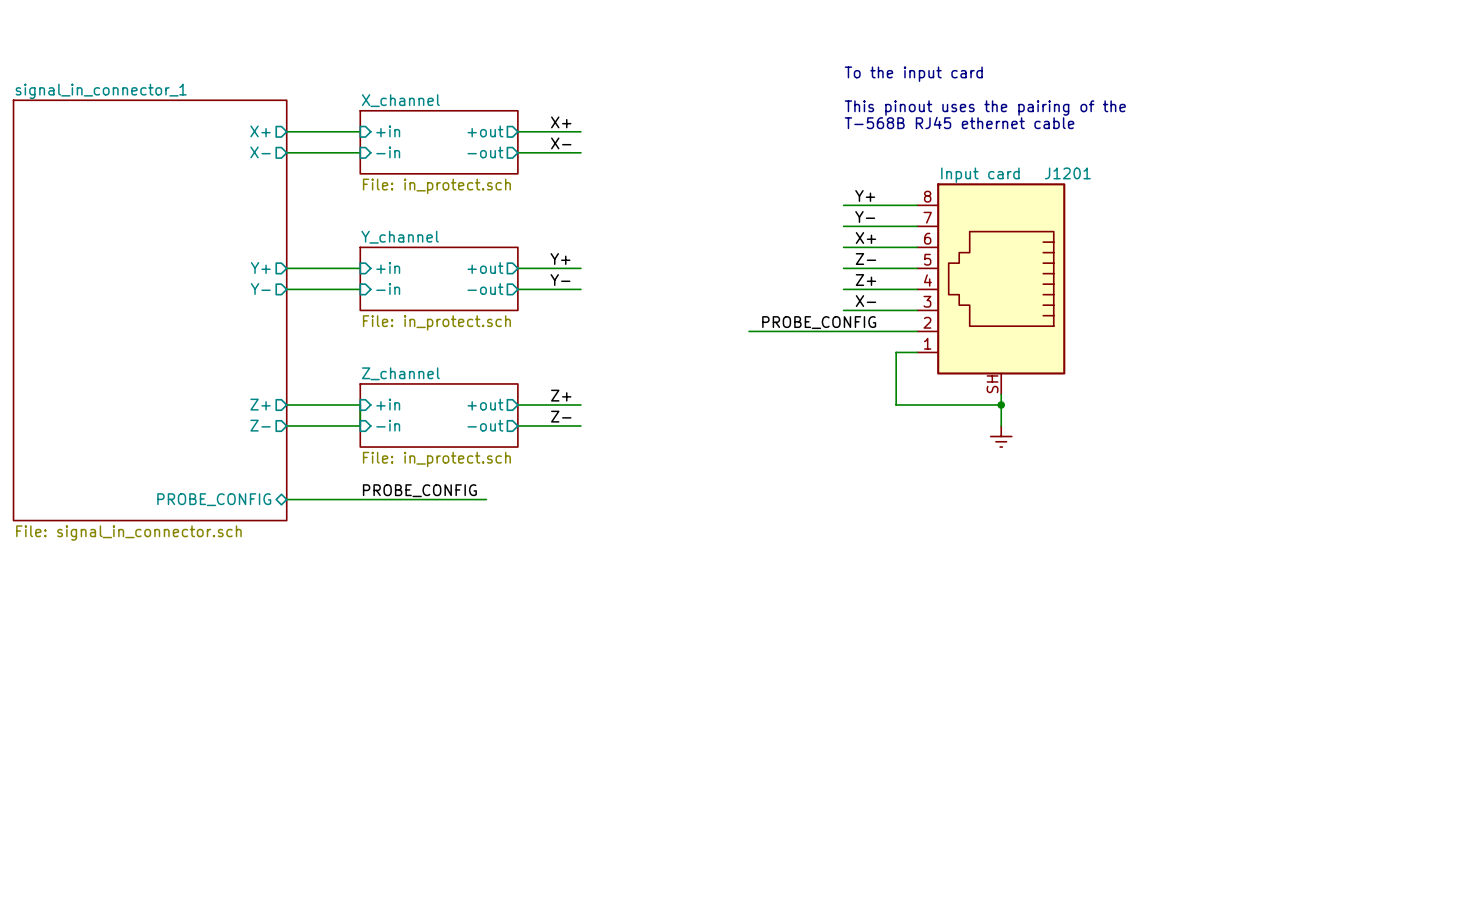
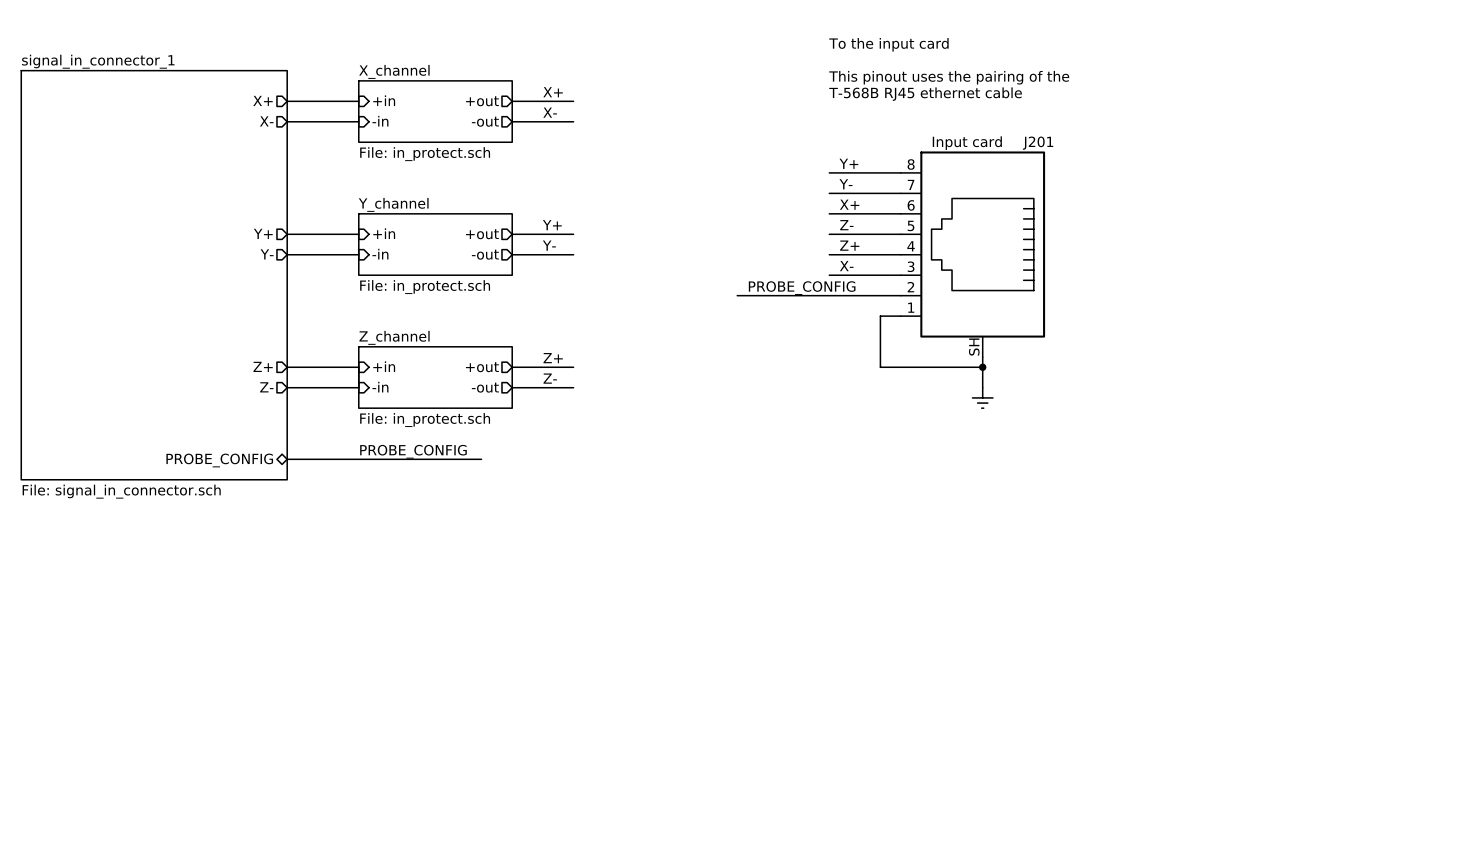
J1201 name: J1201 (1067, 173) -> J201 (1038, 143)

